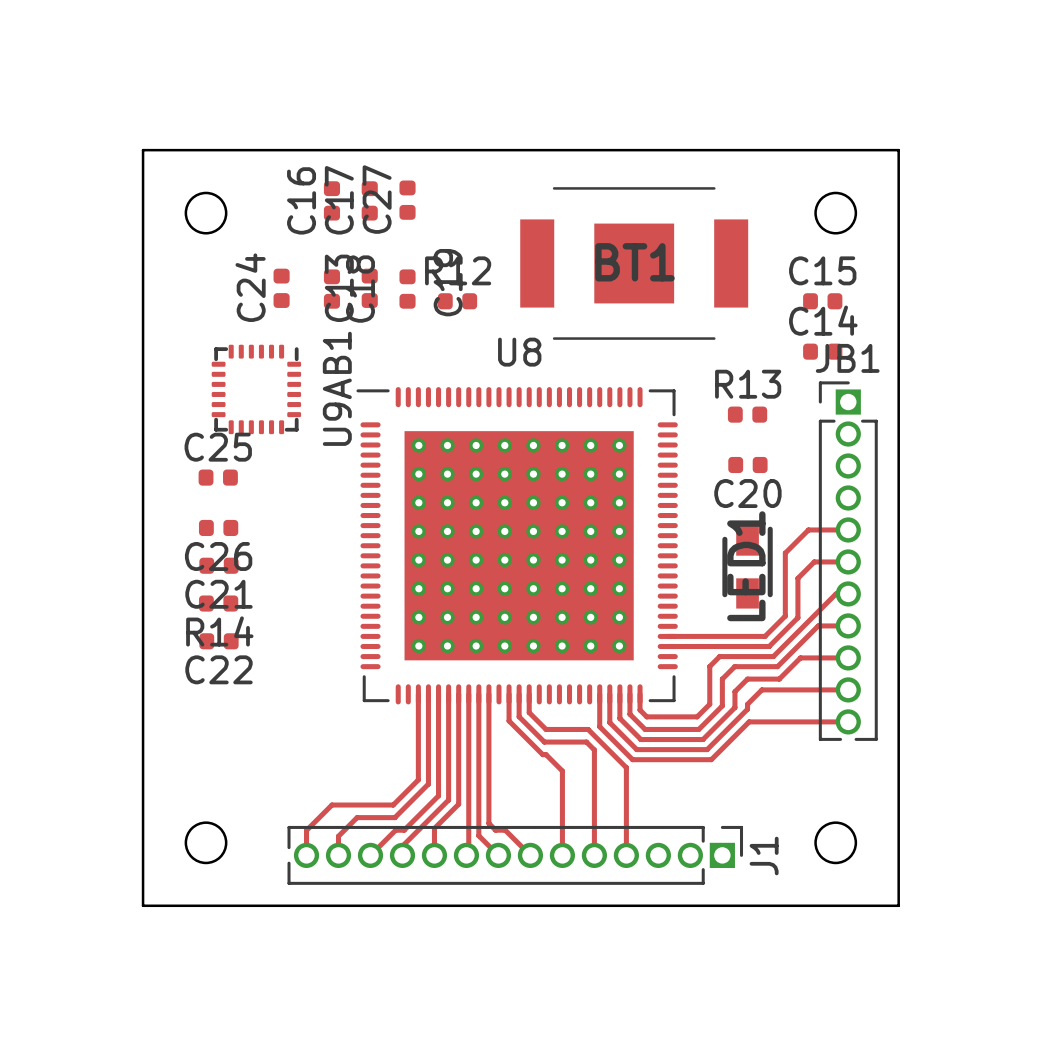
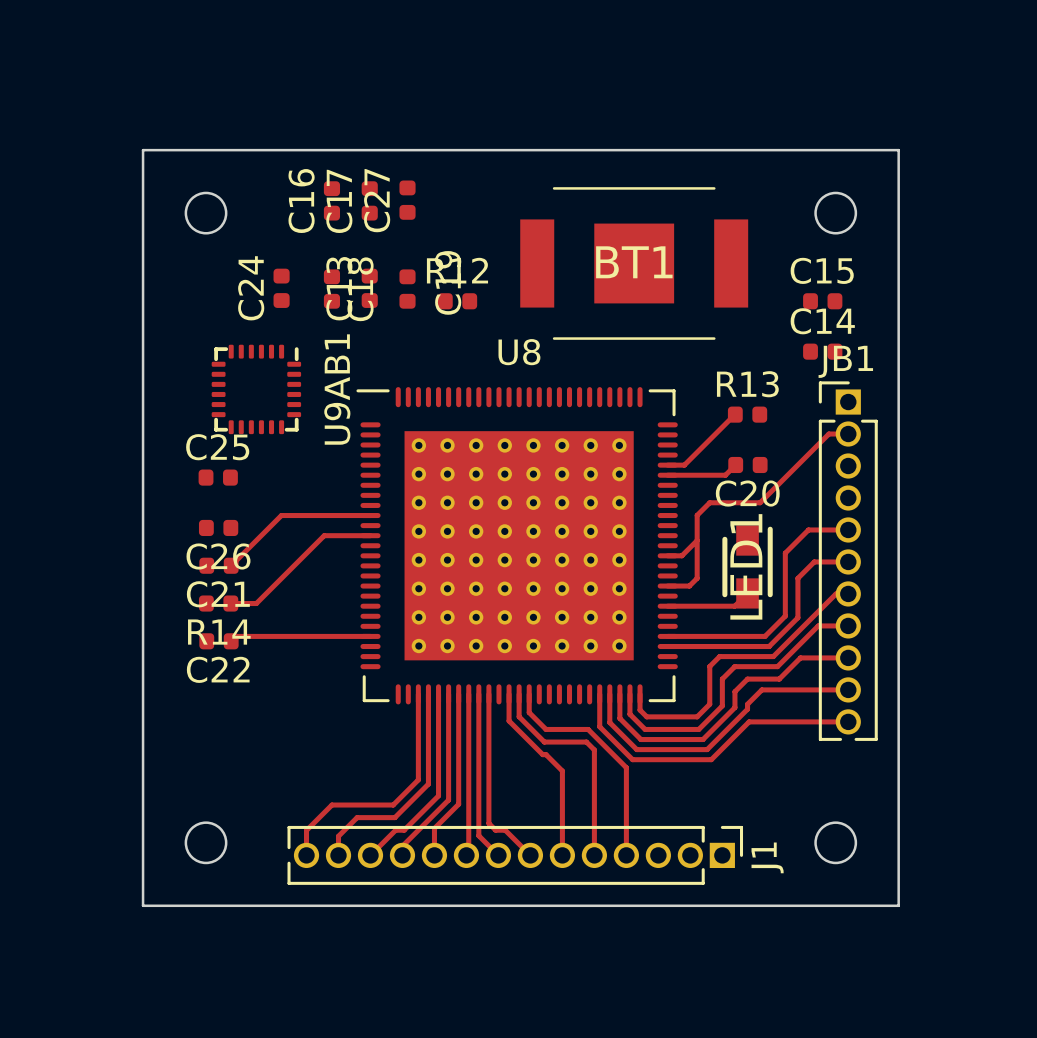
top track: none -> (734, 414) (684, 465) (667, 465)
top track: none -> (848, 434) (828, 434) (760, 502) (709, 502) (697, 515) (697, 578) (689, 586) (667, 586)
top track: none -> (735, 464) (725, 475) (667, 475)
top track: none -> (370, 515) (281, 515) (231, 565)
top track: none -> (370, 535) (324, 535) (256, 603) (230, 603)
top track: none -> (697, 540) (681, 555) (667, 555)
top track: none -> (747, 593) (734, 606) (667, 606)
top track: none -> (370, 636) (236, 636) (231, 641)

